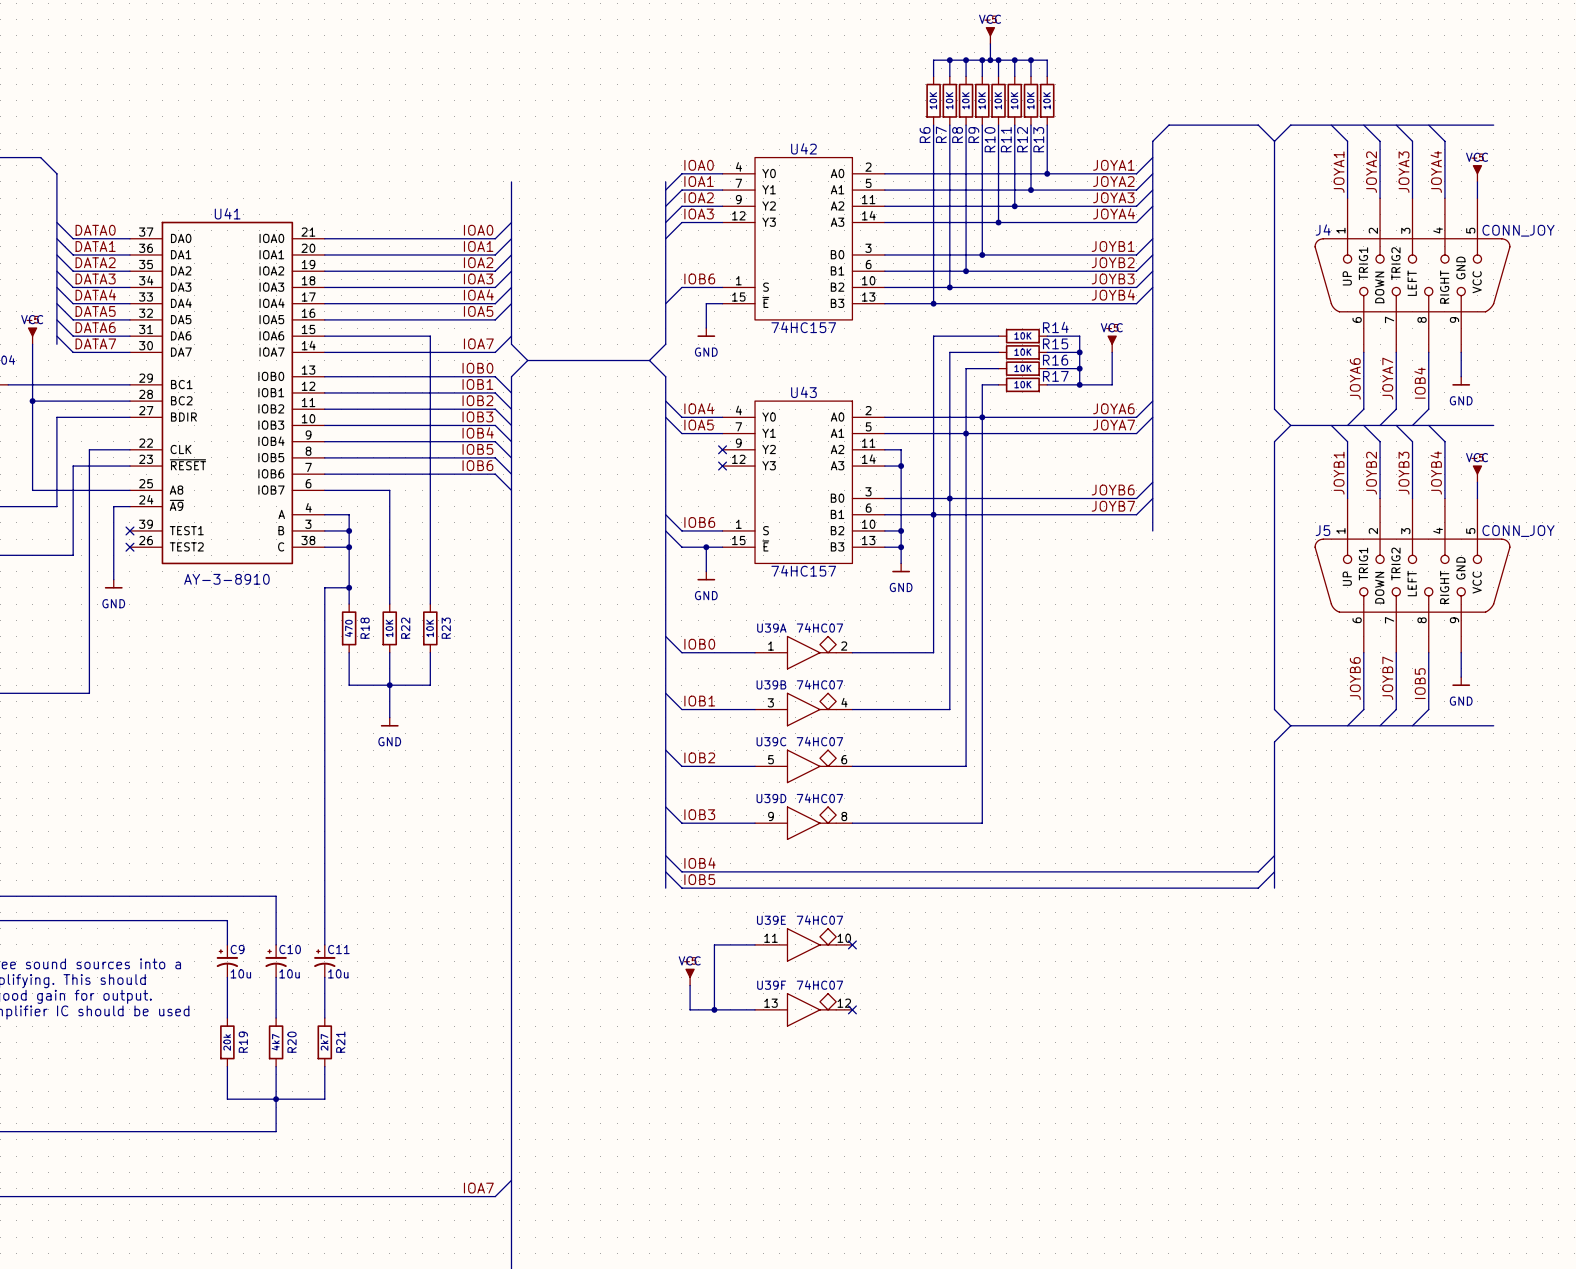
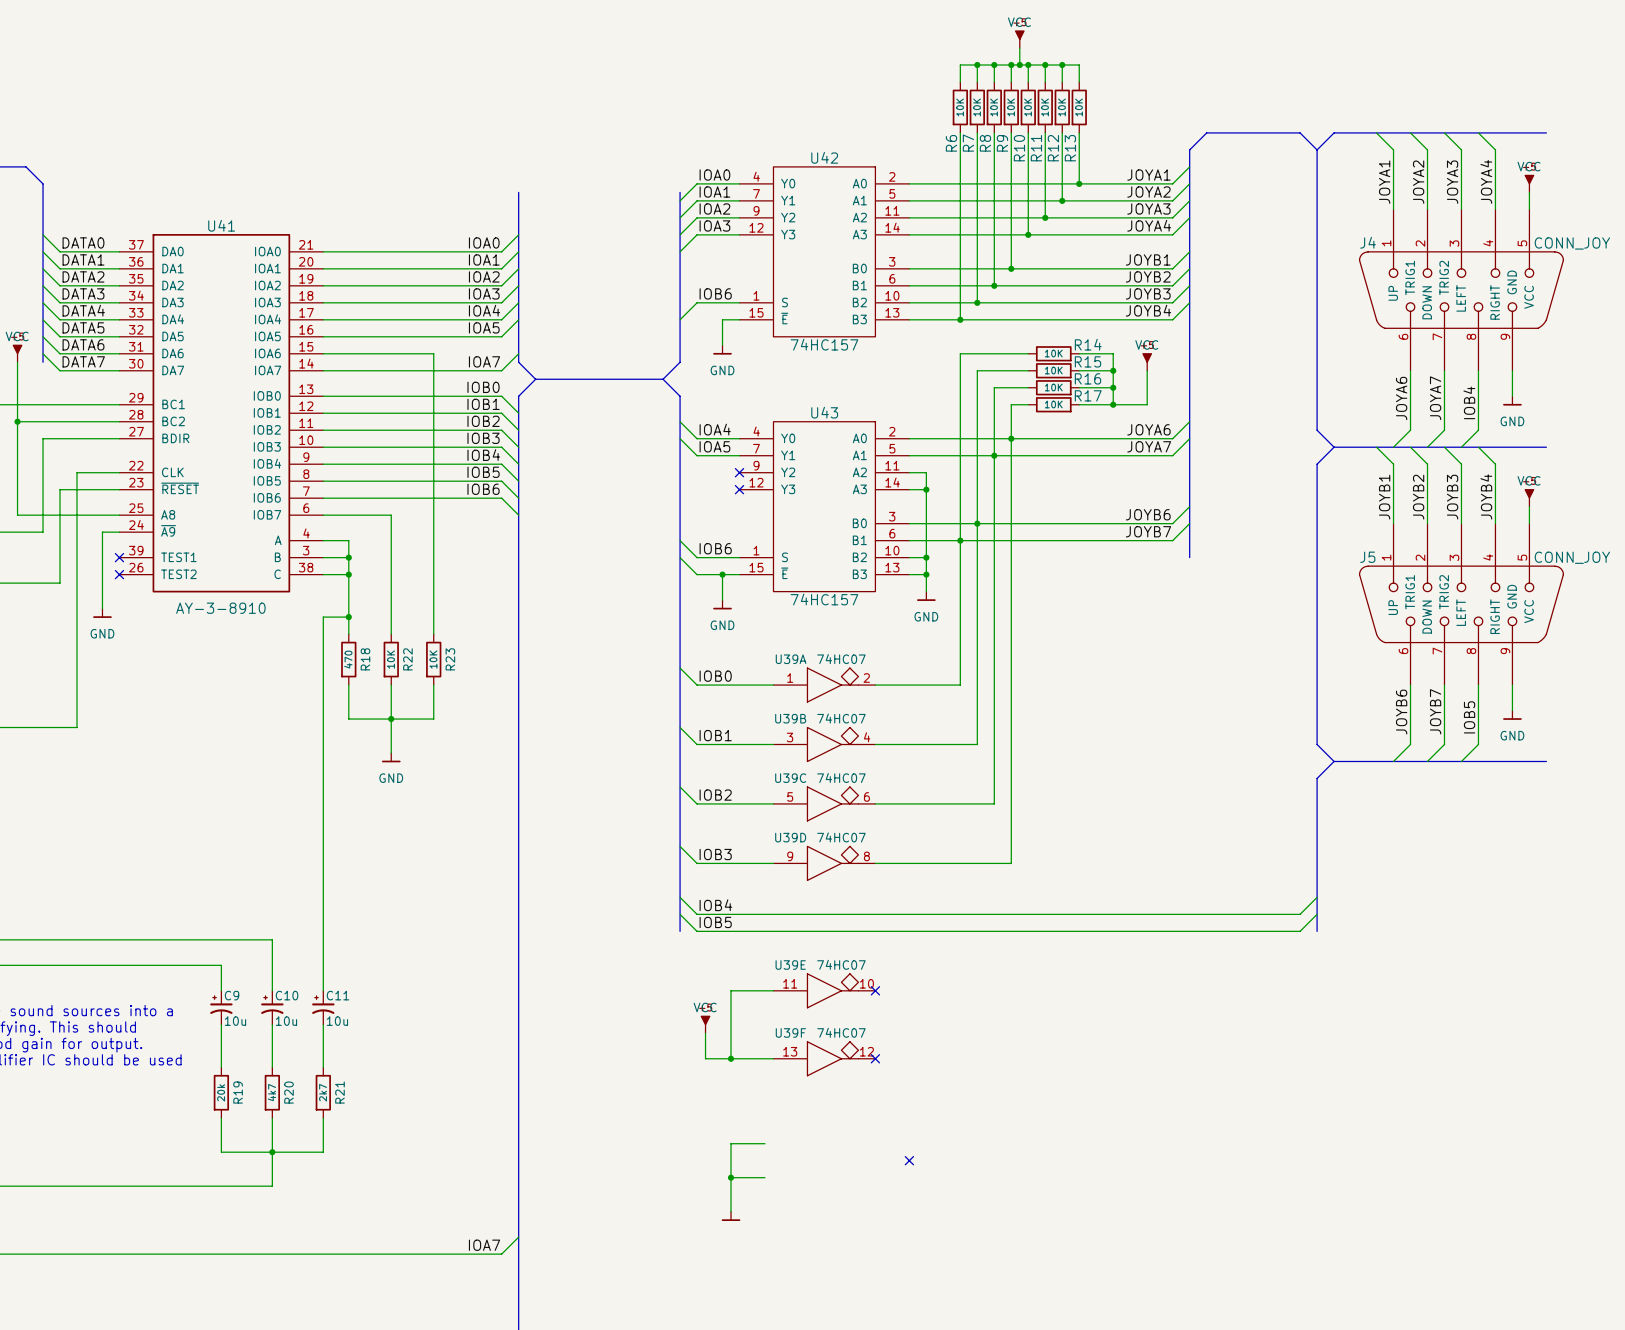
wire: none -> (764, 1143) (731, 1143) (731, 1211)
no-connect mark: none -> (909, 1160)
wire: none -> (731, 1177) (764, 1177)
junction: none -> (731, 1177)
power symbol: none -> (731, 1216)

